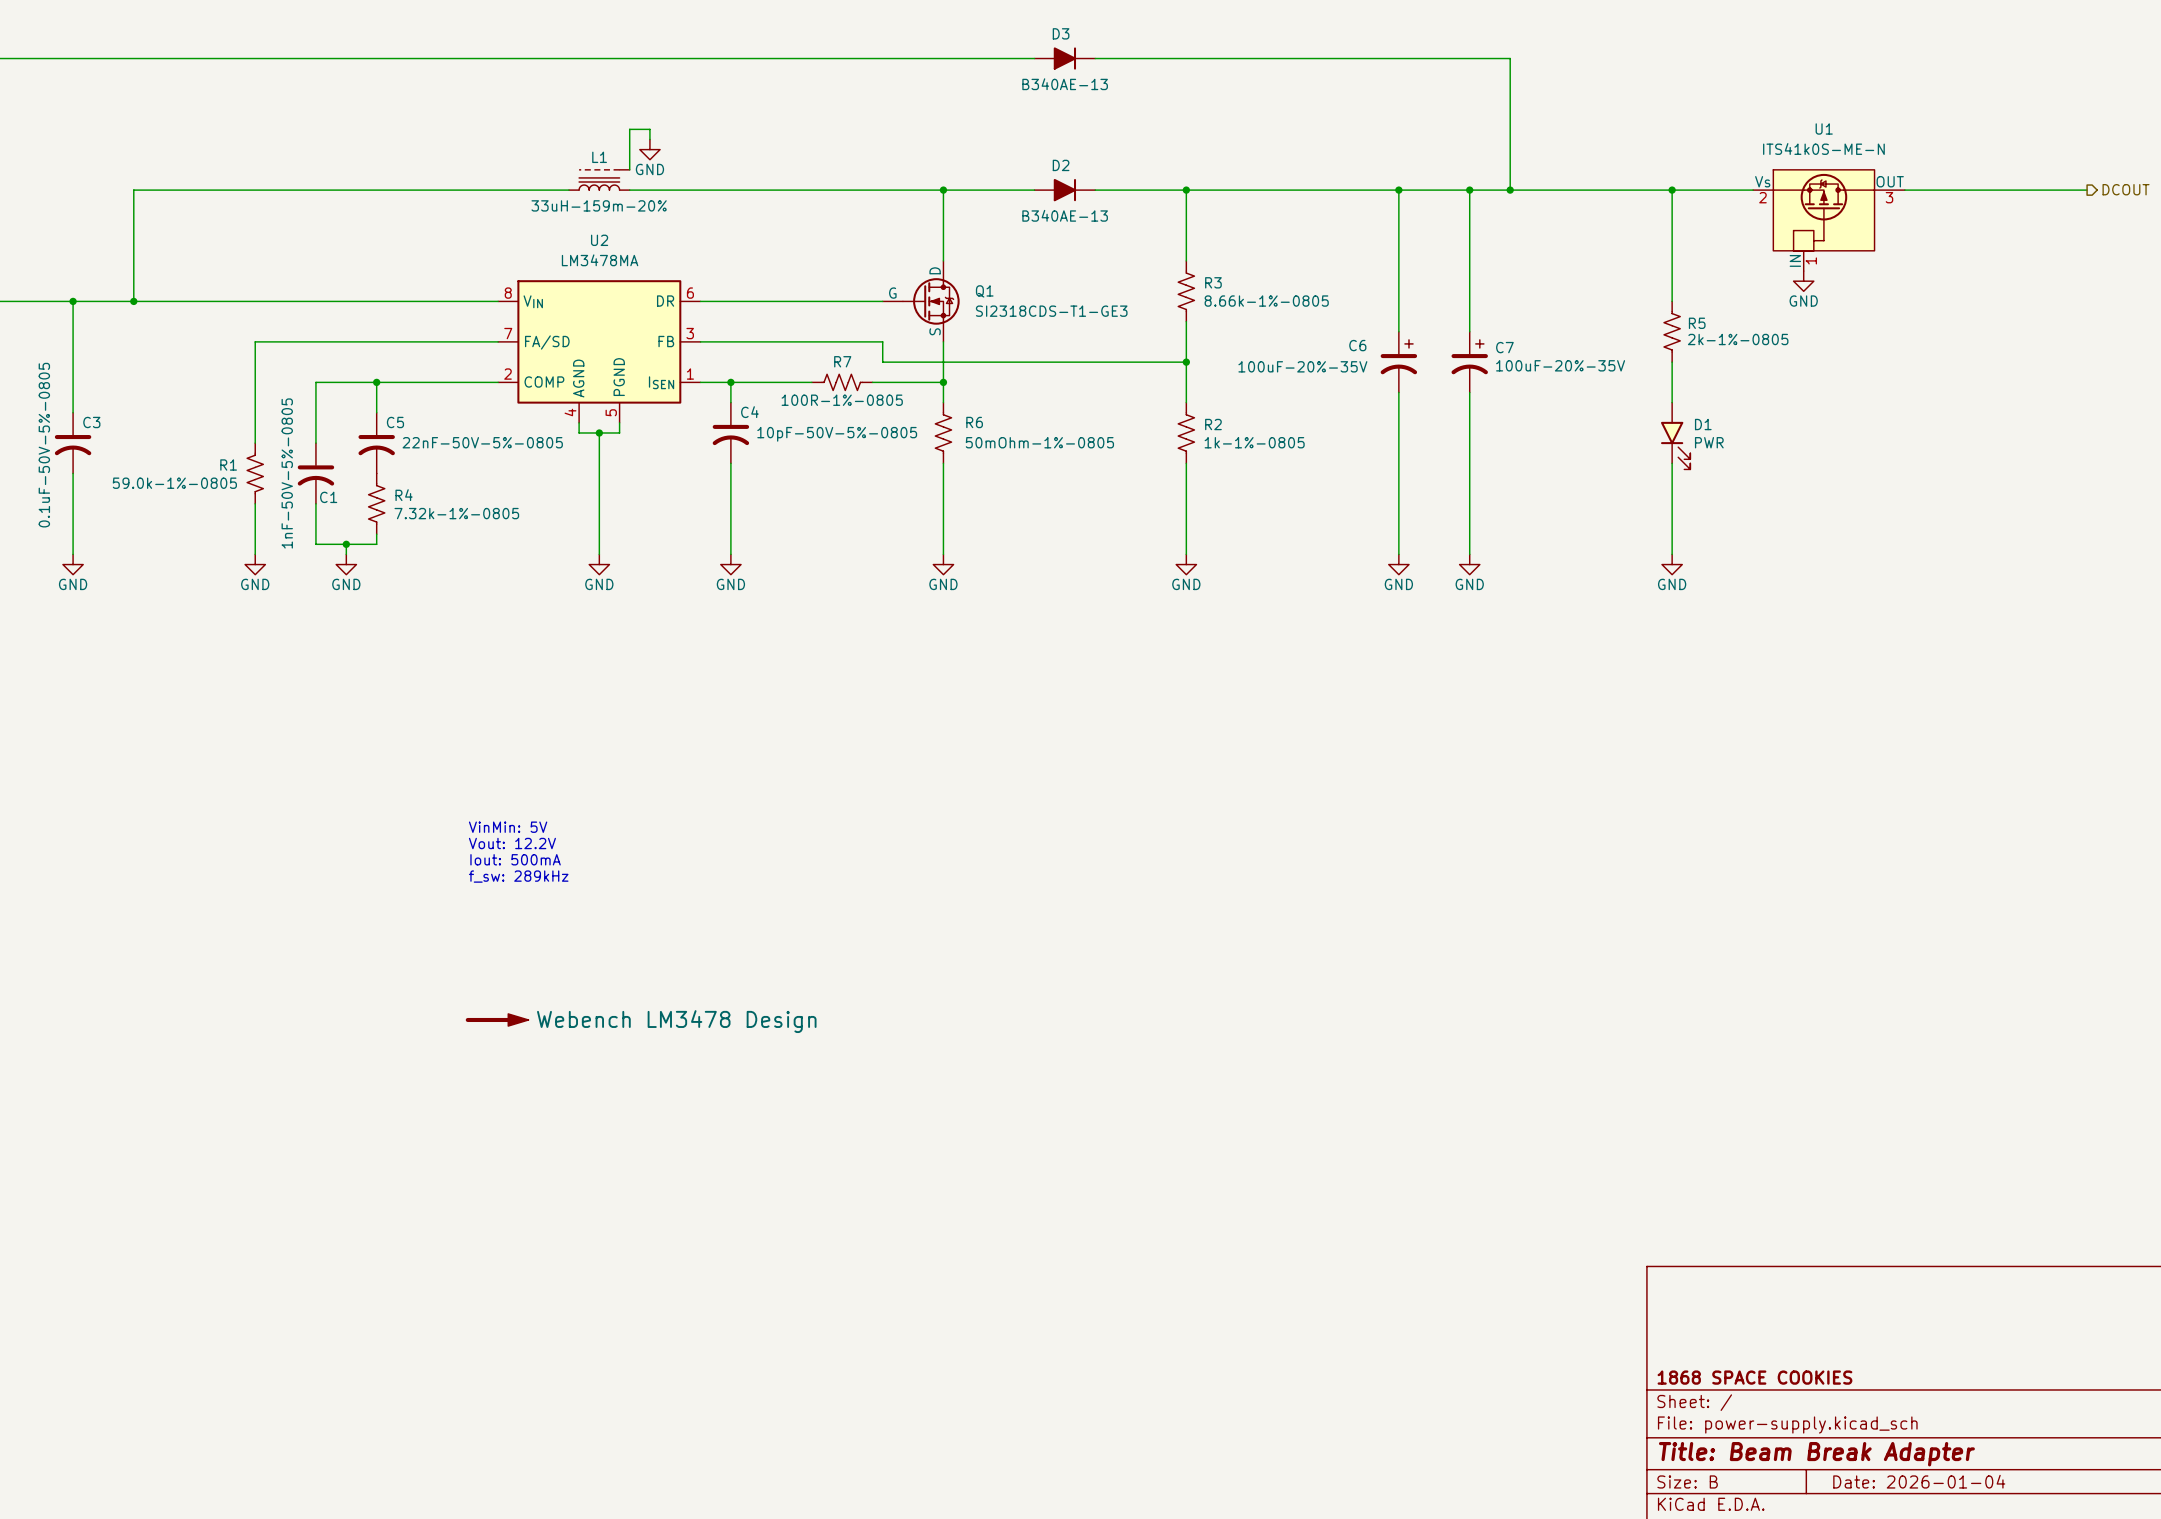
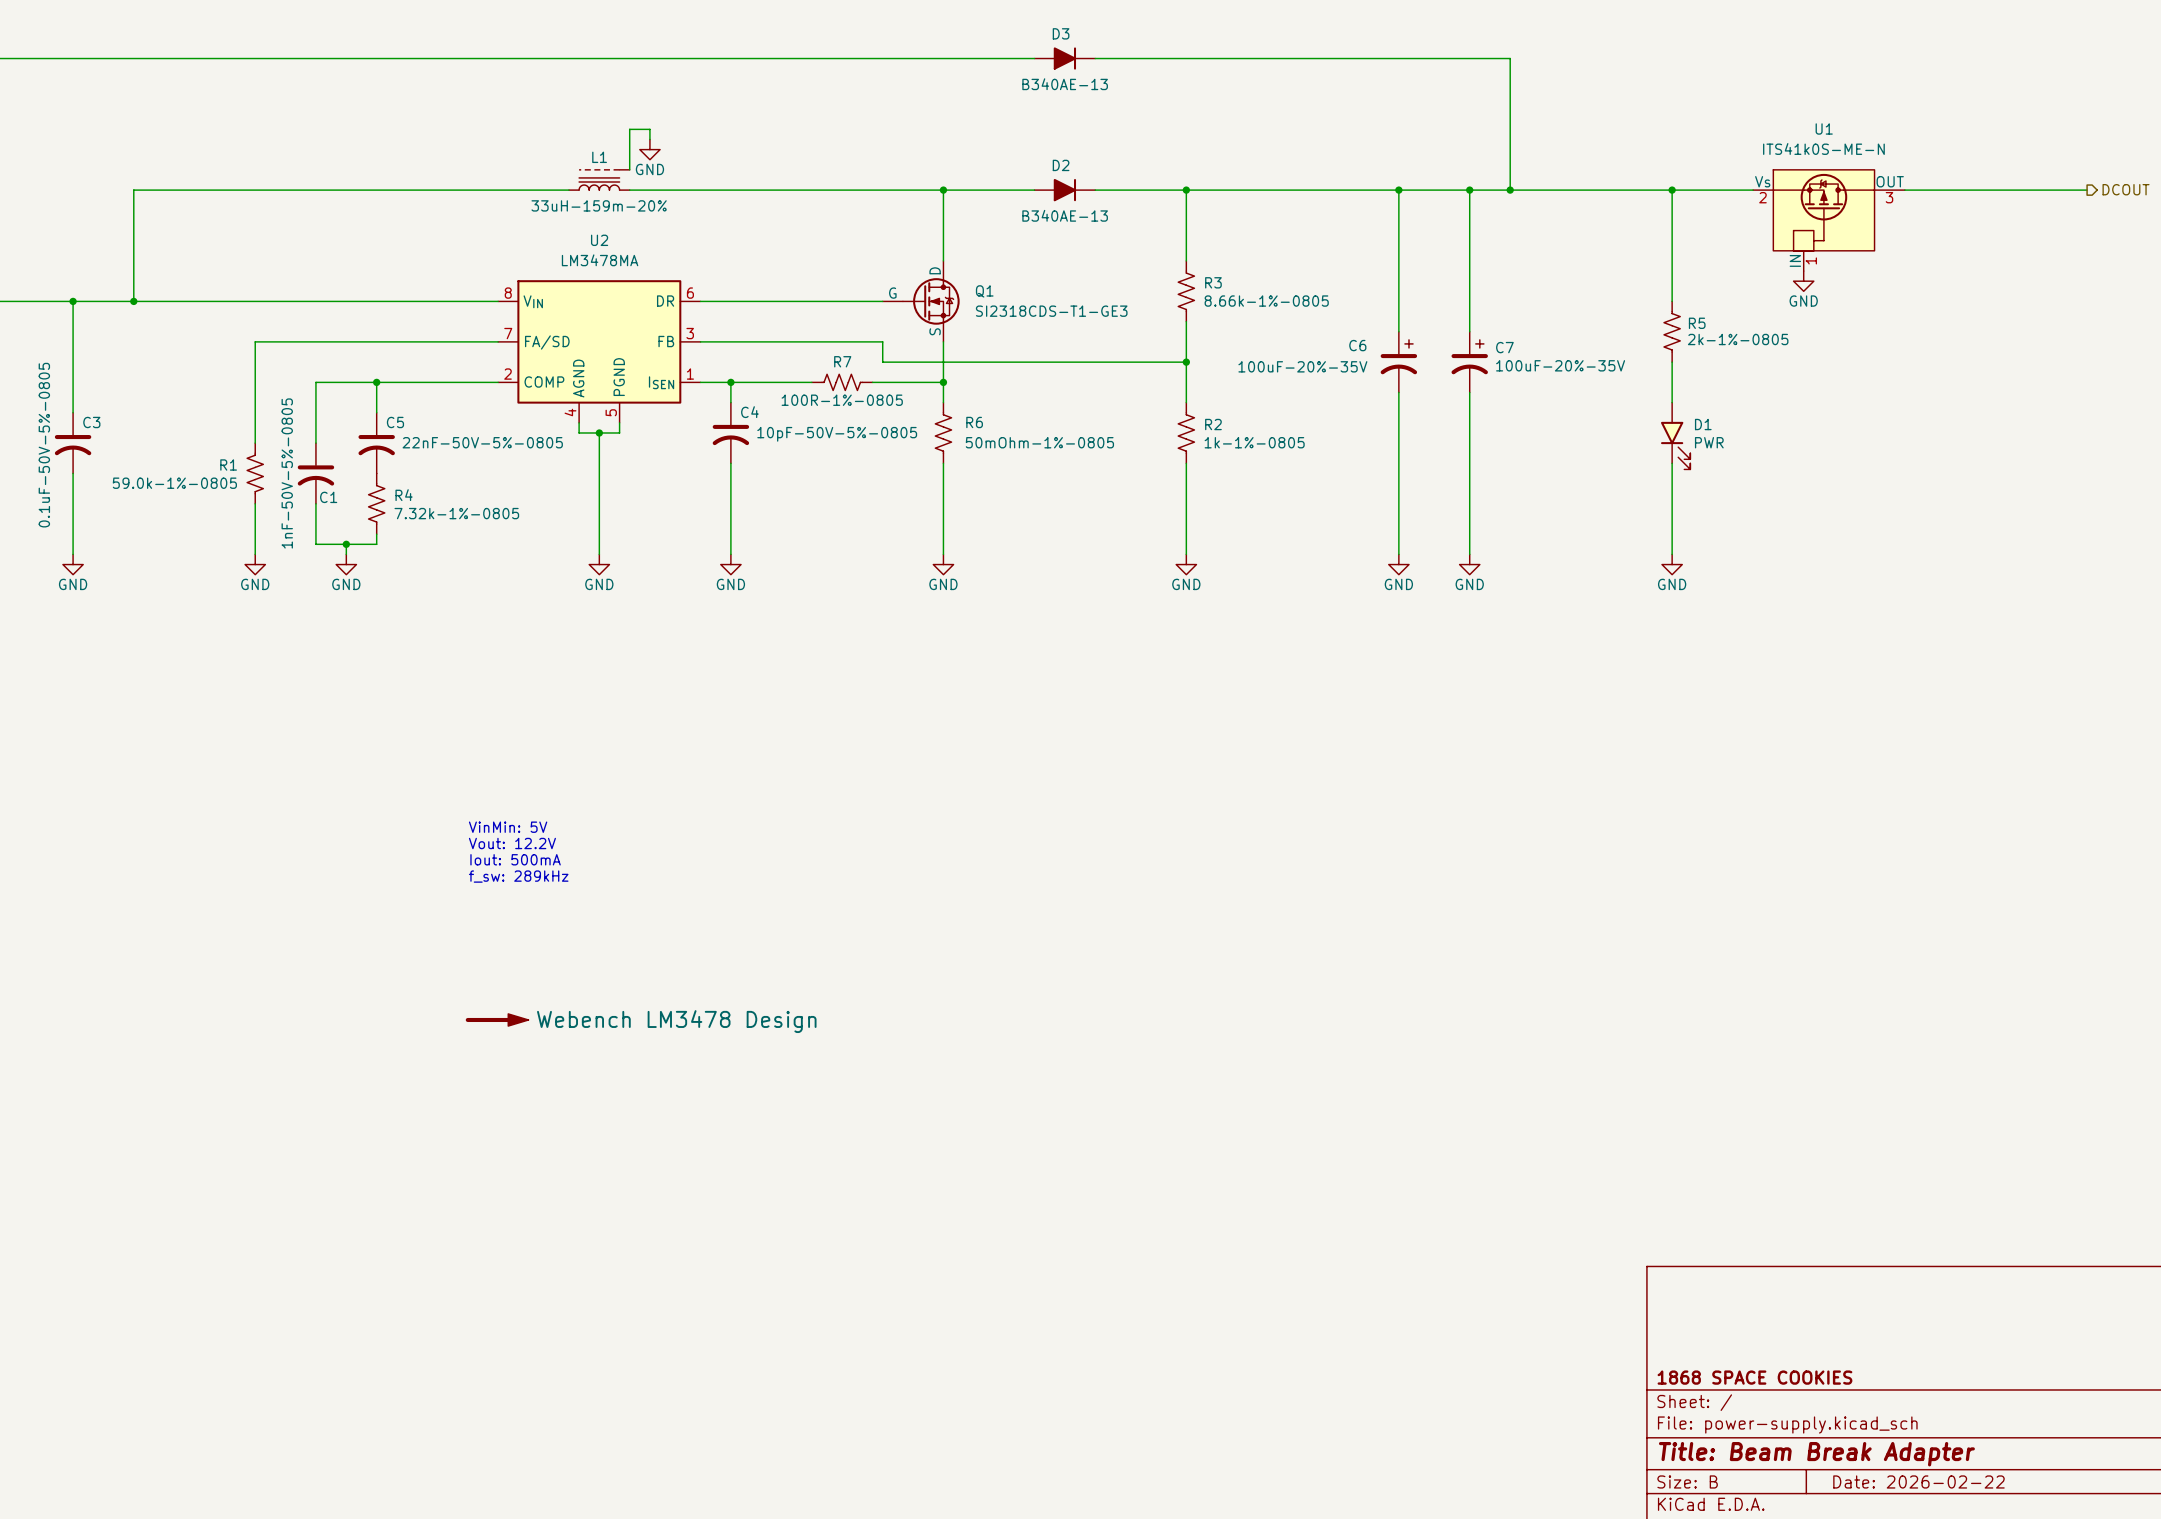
title block: Date: 2026-01-04 (1919, 1481) -> Date: 2026-02-22 (1918, 1481)

